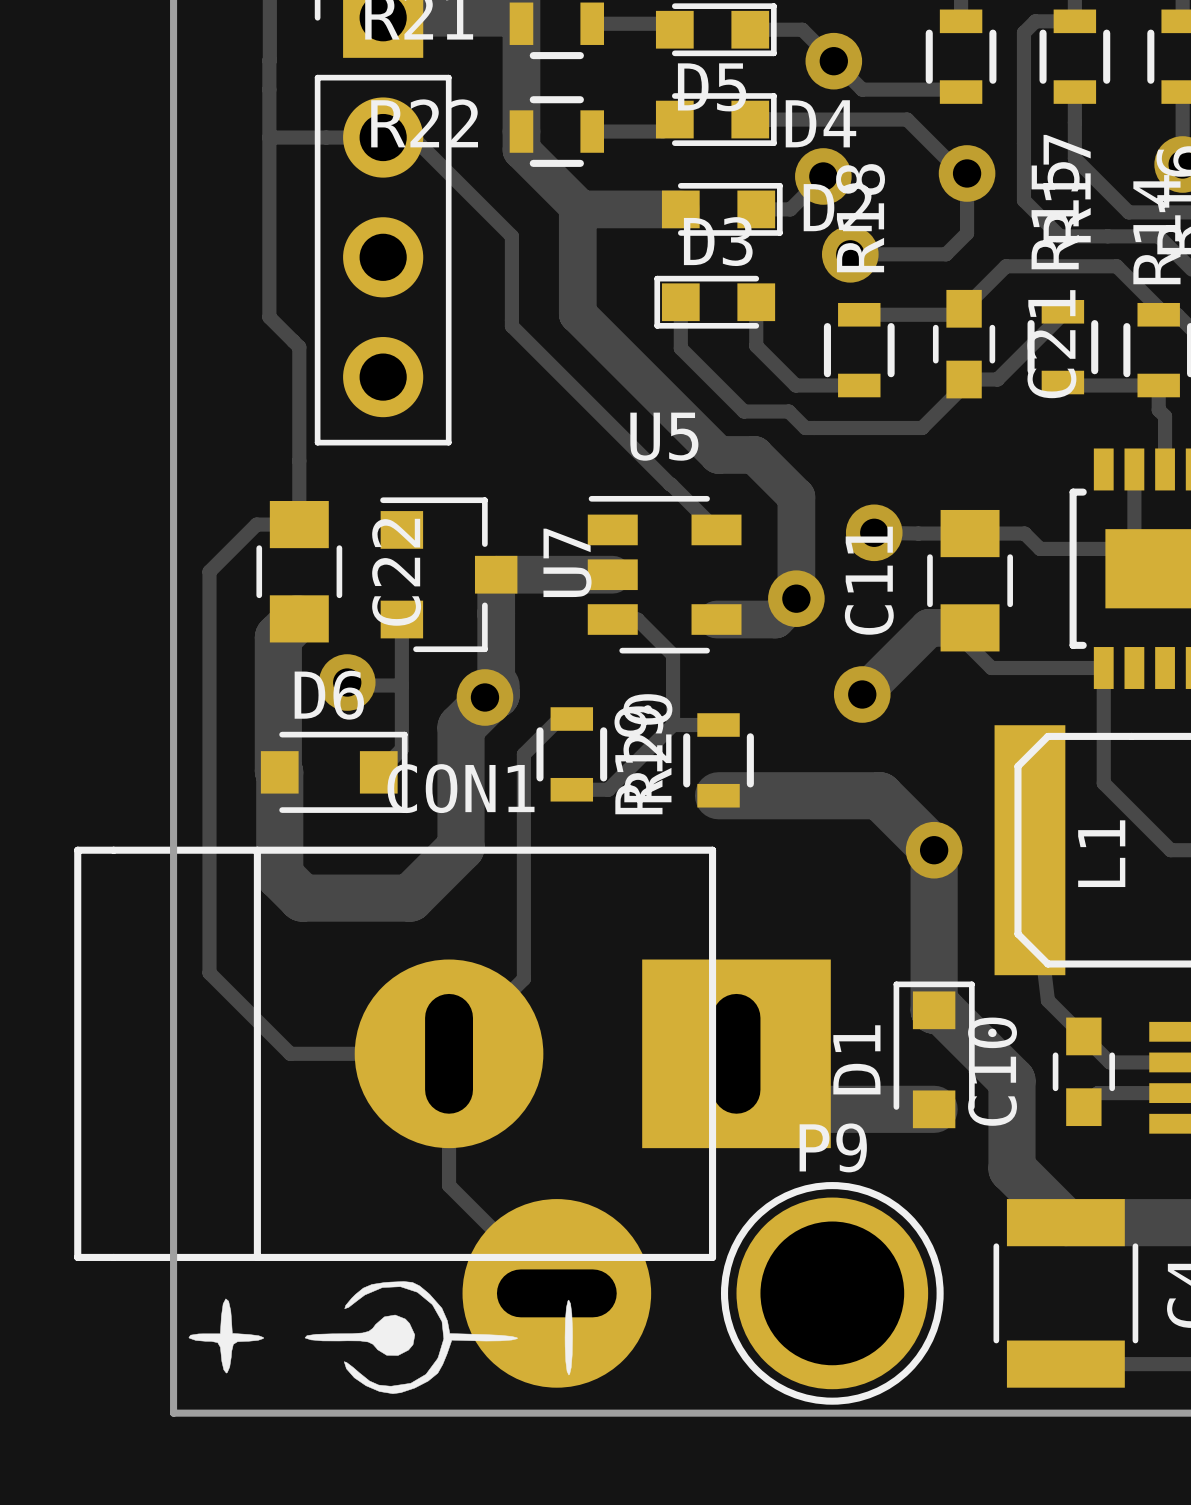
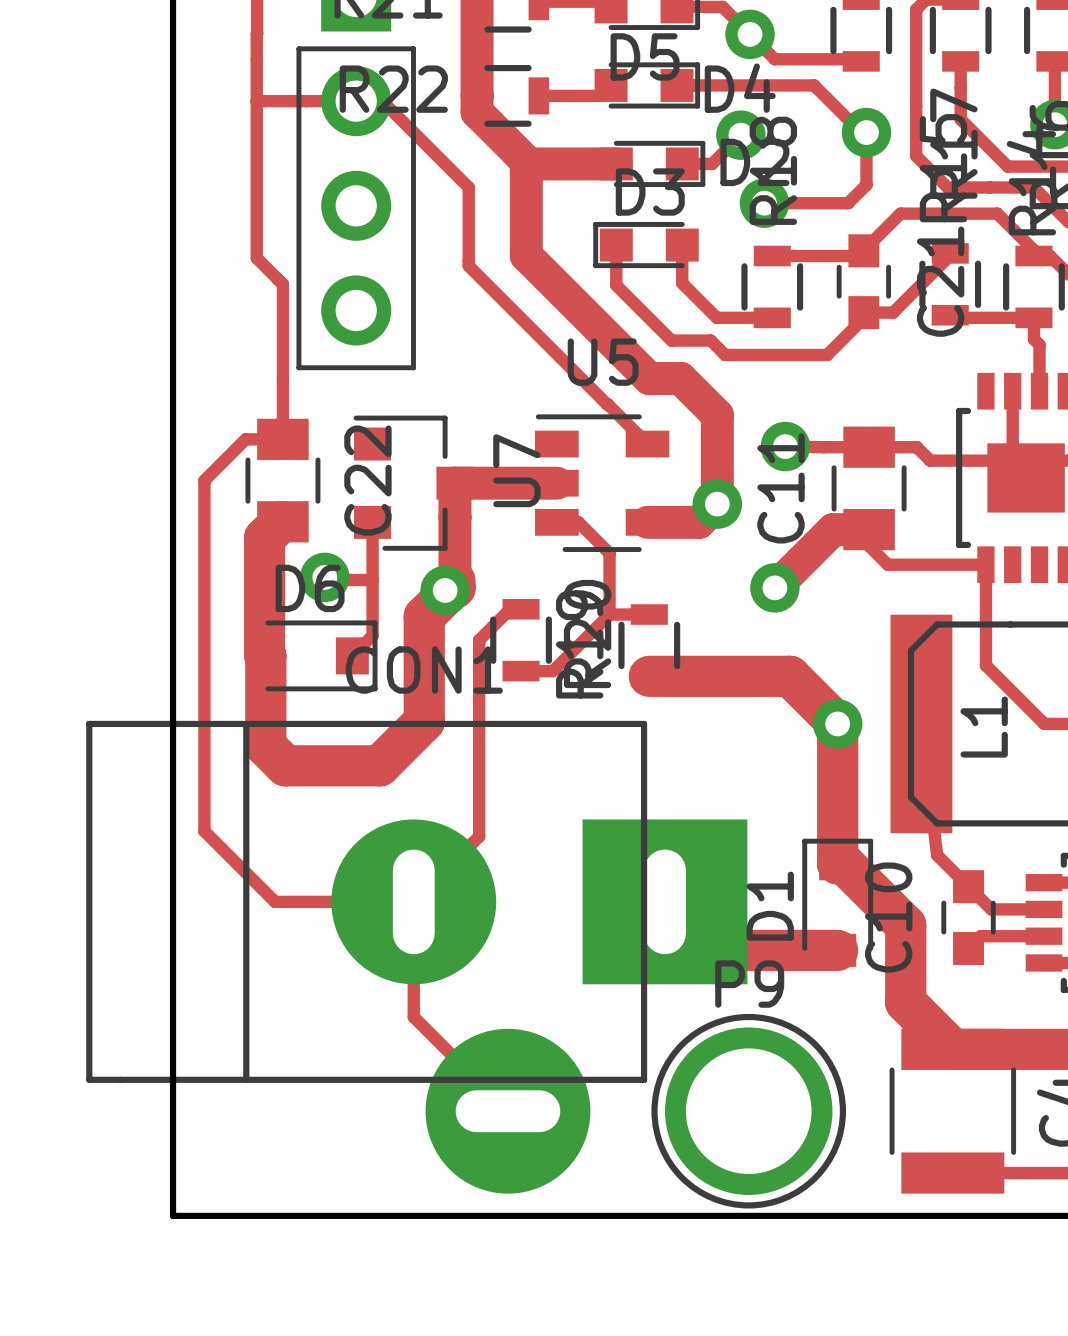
drawing: [188, 1281, 573, 1394] -> none

